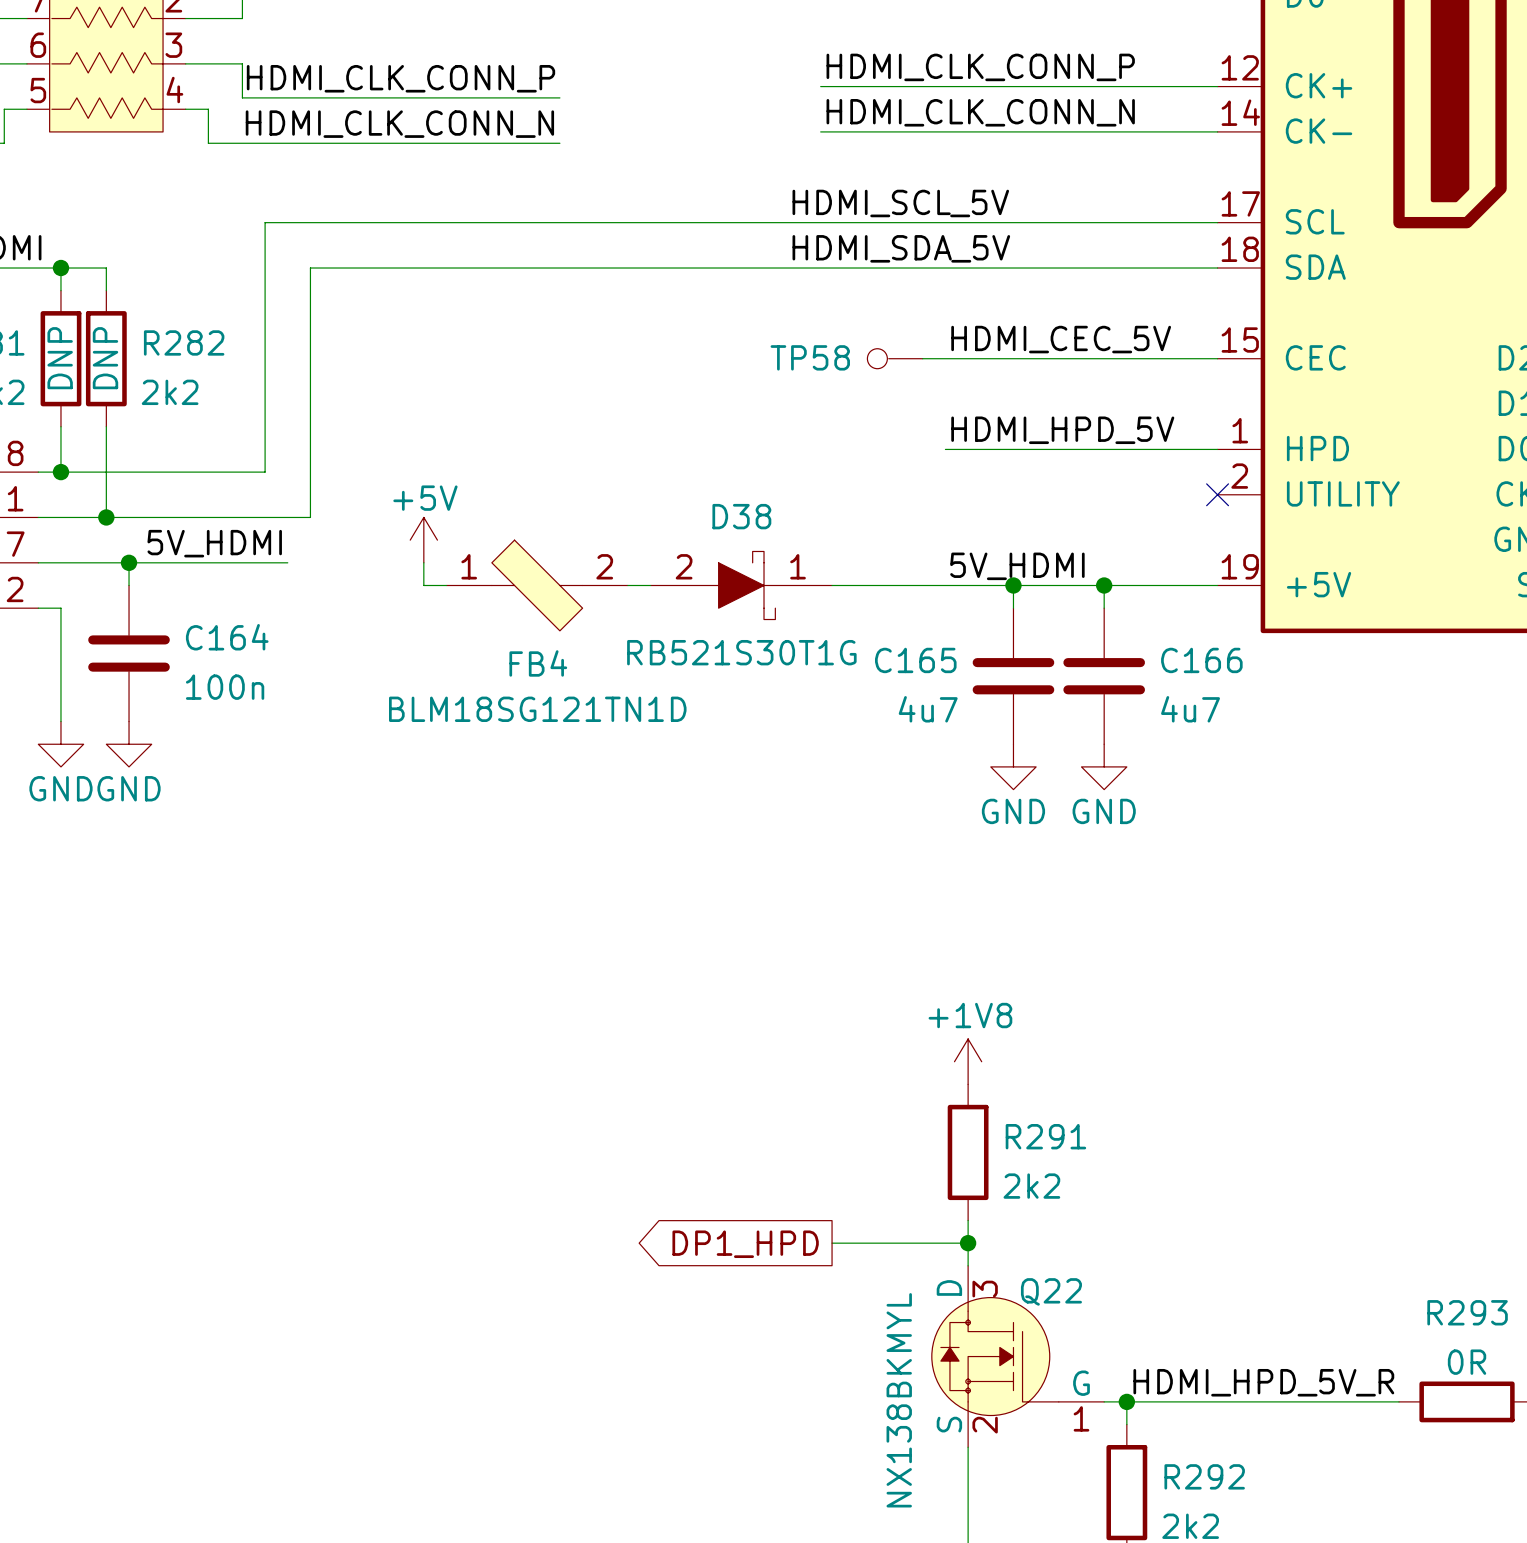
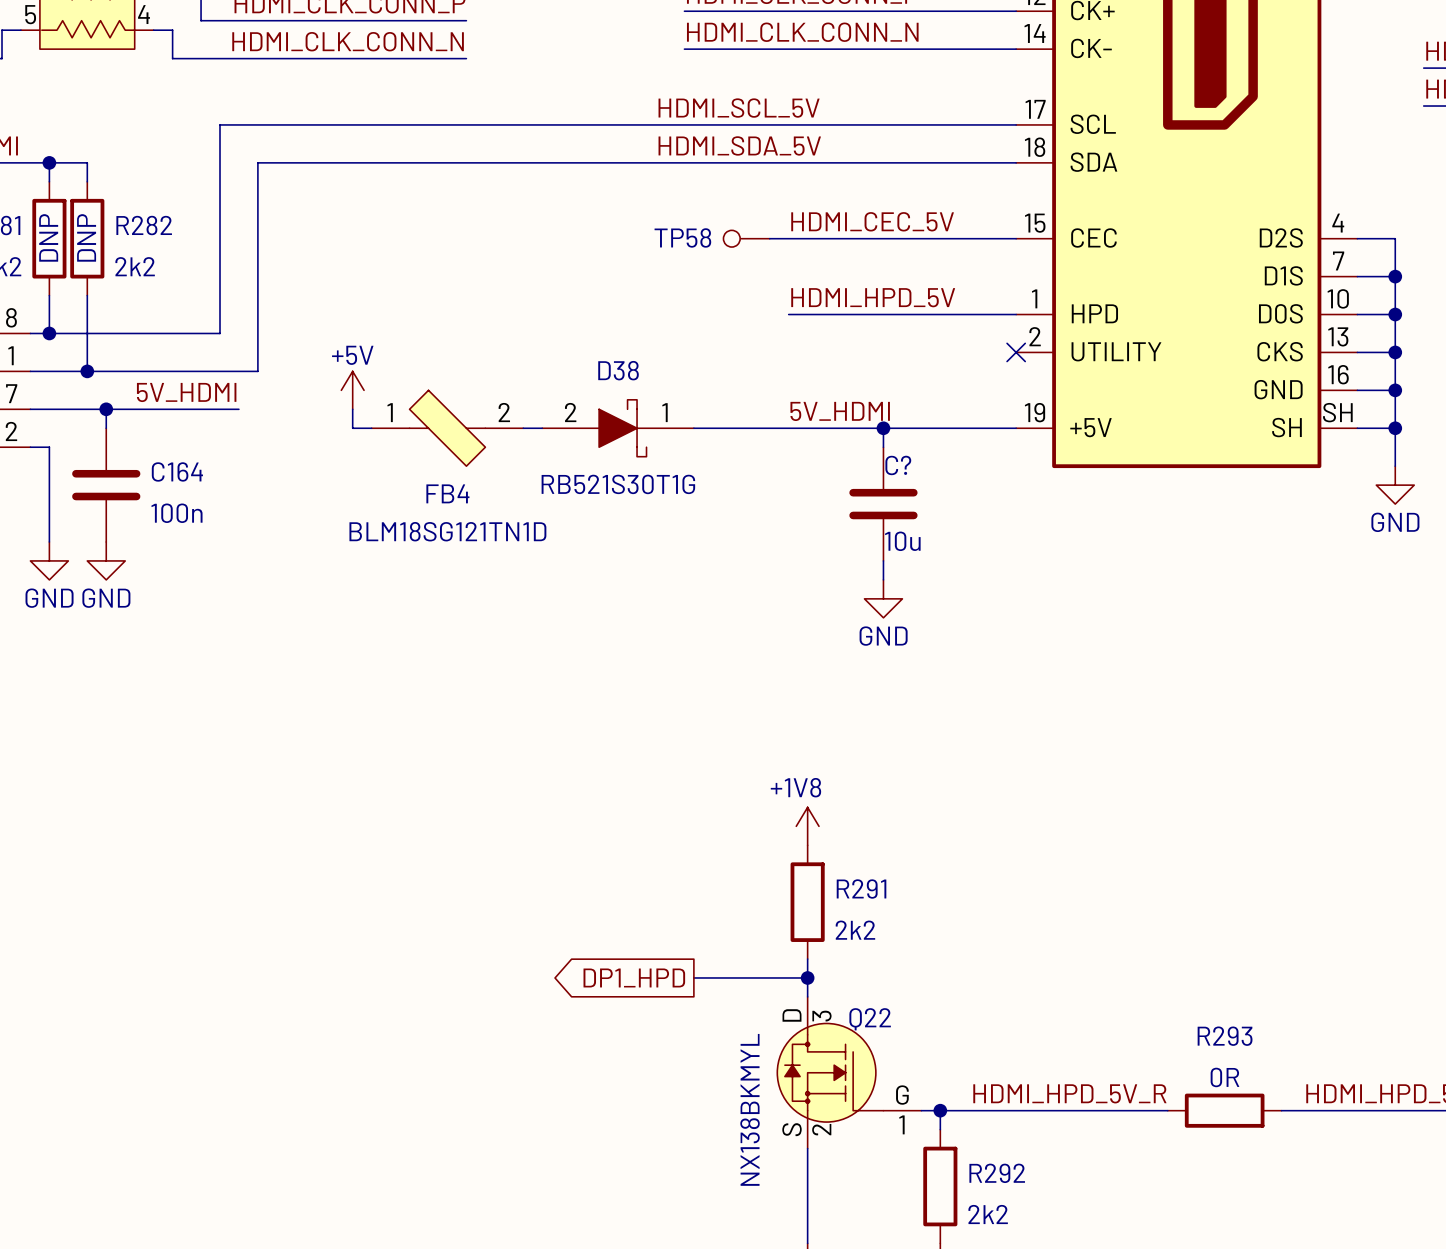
wire: (1013, 585) (1013, 608) -> (883, 428) (883, 447)
junction: (1013, 585) -> none
junction: none -> (883, 428)
wire: (1104, 585) (1104, 608) -> (883, 560) (883, 579)
junction: (1104, 585) -> none
C165: (1013, 676) -> none
C?: none -> (883, 504)
C166: (1104, 676) -> none
power symbol: GND (1013, 766) -> none
power symbol: GND (1104, 766) -> none
power symbol: none -> GND (883, 598)

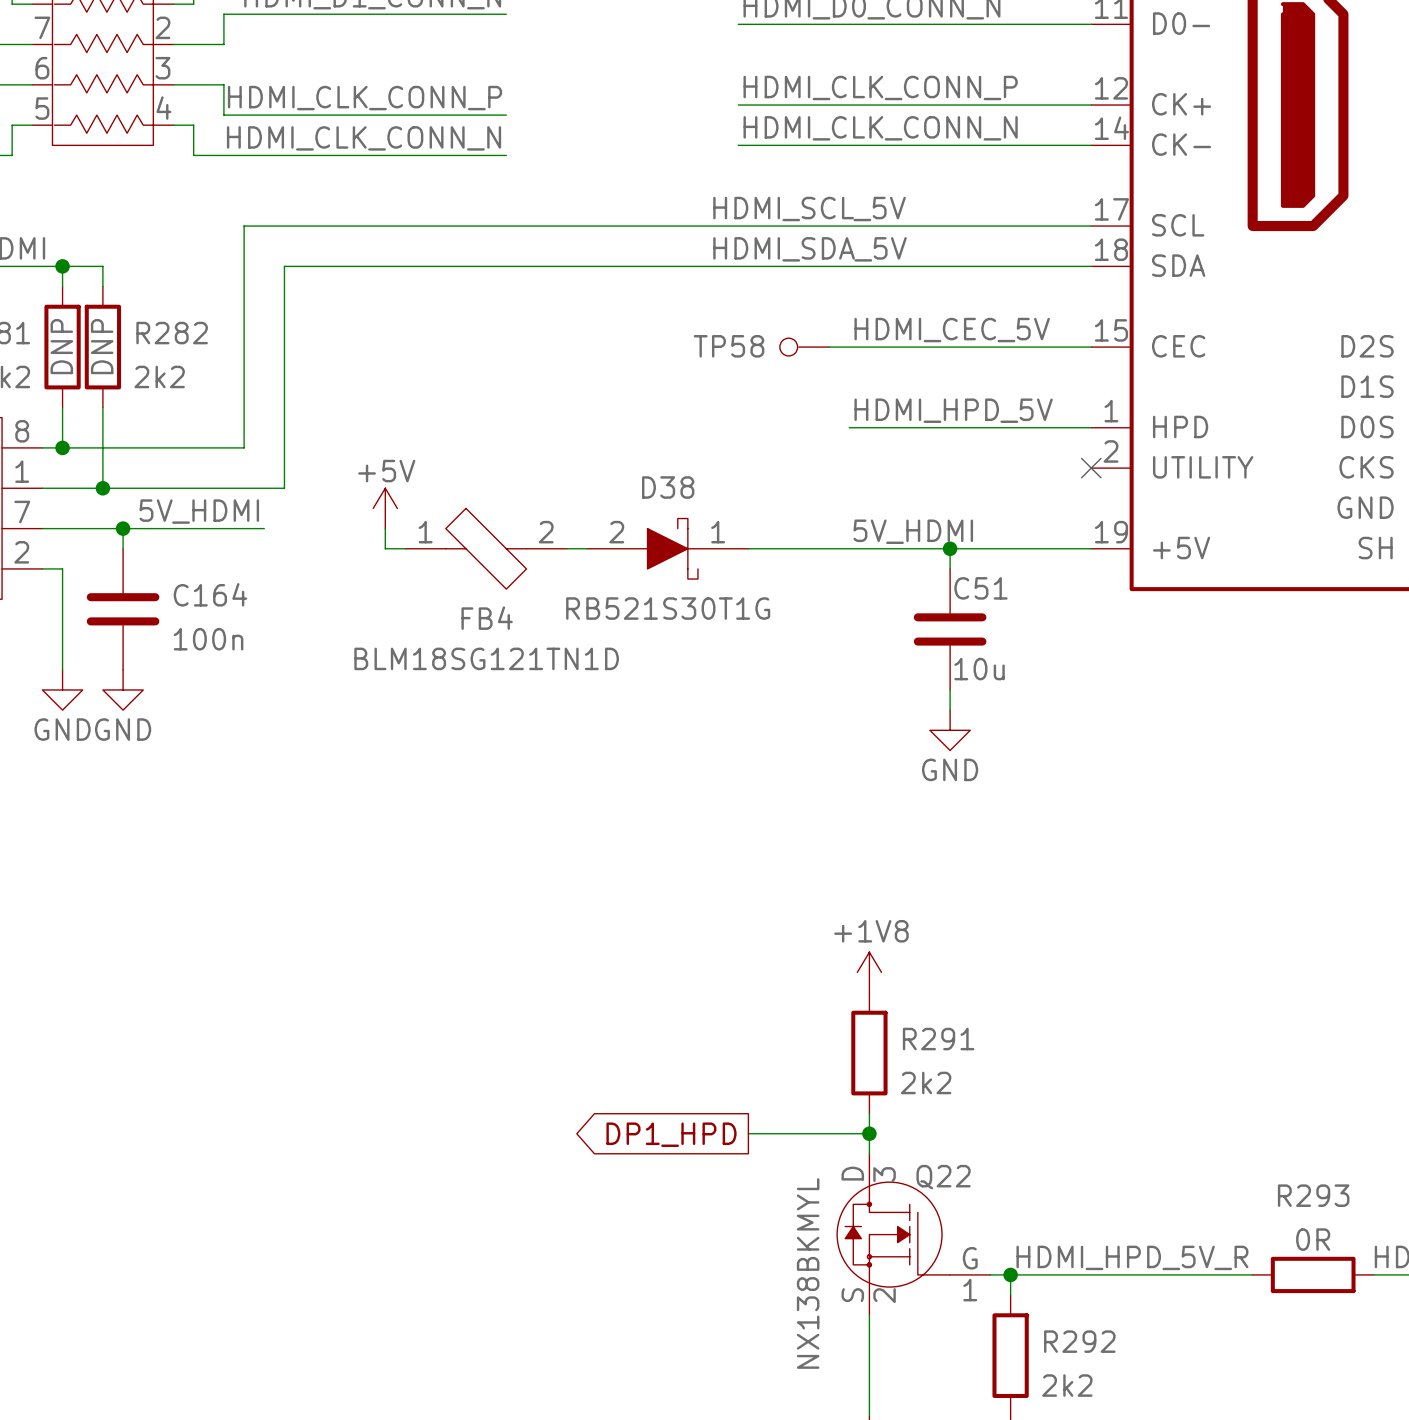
C? name: C? (898, 465) -> C51 (980, 588)

